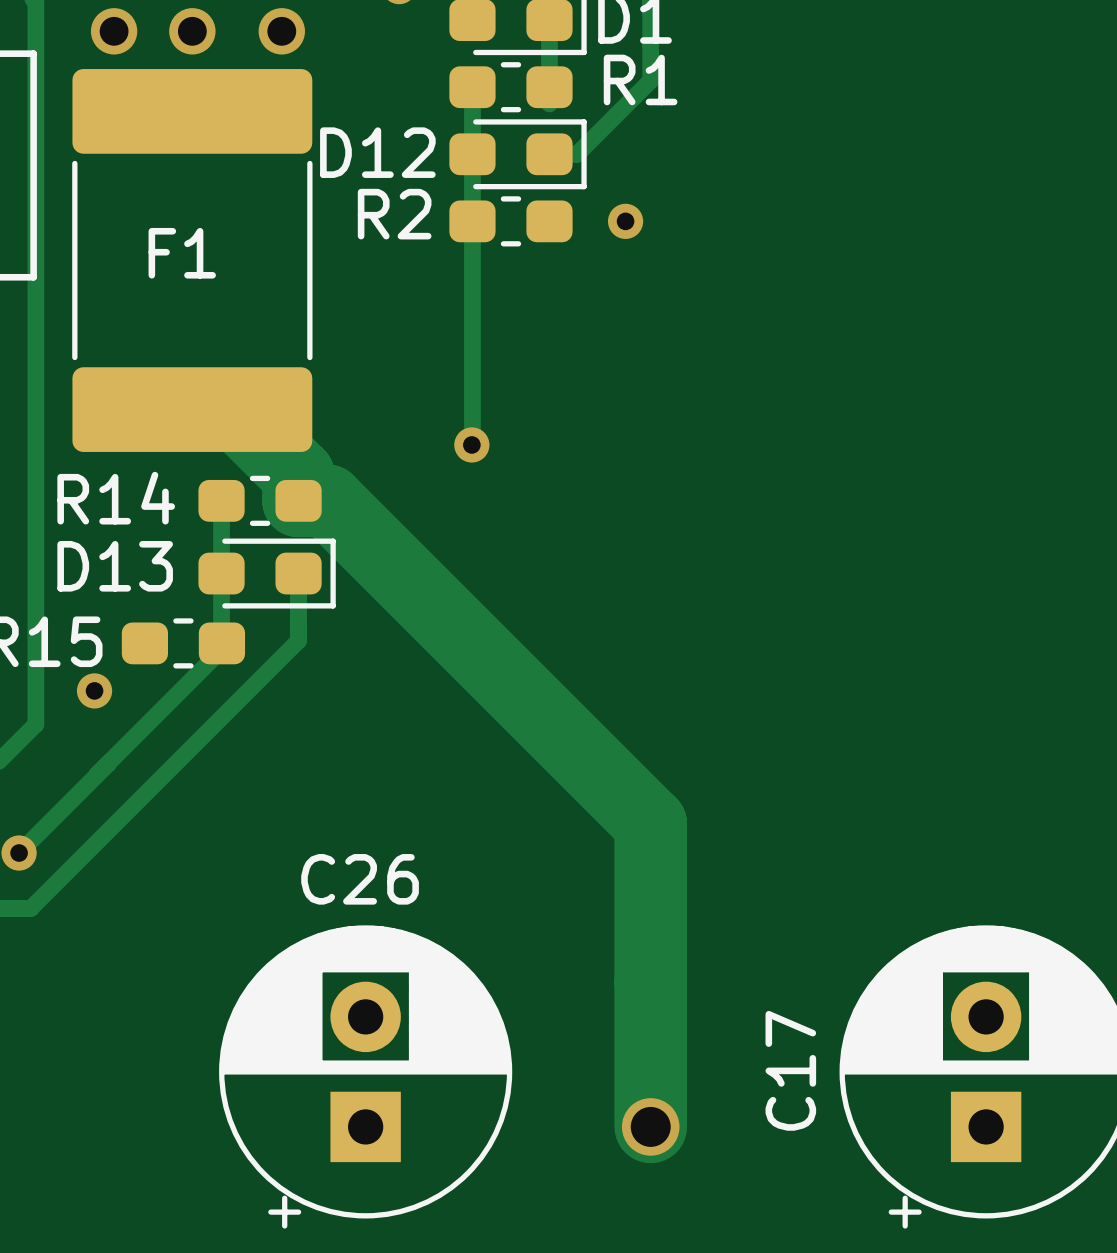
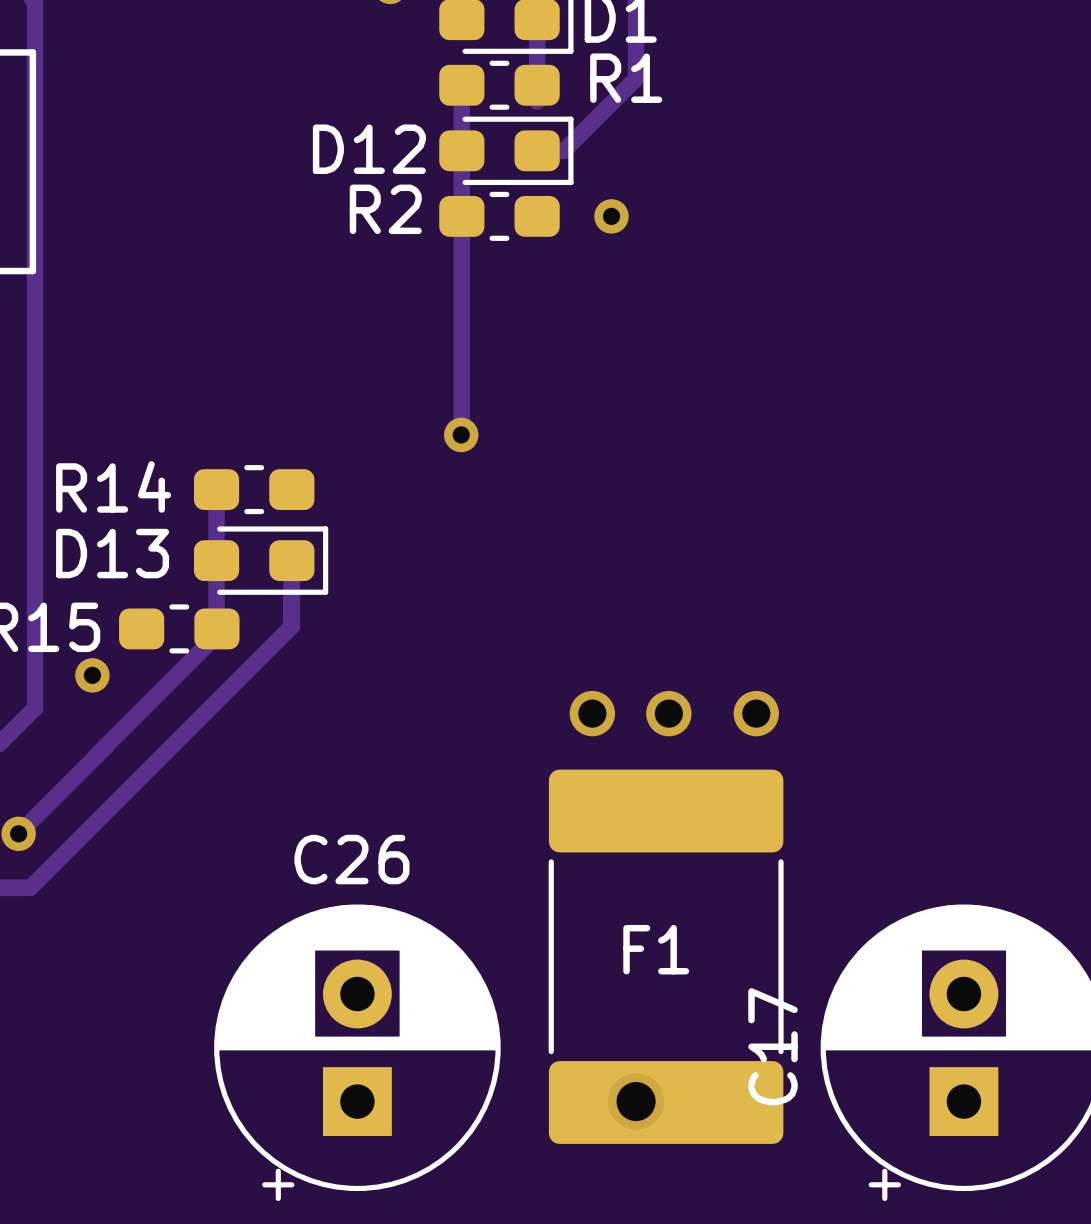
via: (114, 31) -> none
via: (192, 31) -> none
via: (281, 31) -> none
F1 position: (192, 260) -> (666, 956)
track: (192, 409) (232, 409) (298, 475) (298, 500) (327, 500) (650, 823) (650, 1126) -> none
via: none -> (592, 713)
via: none -> (668, 713)
via: none -> (756, 713)

